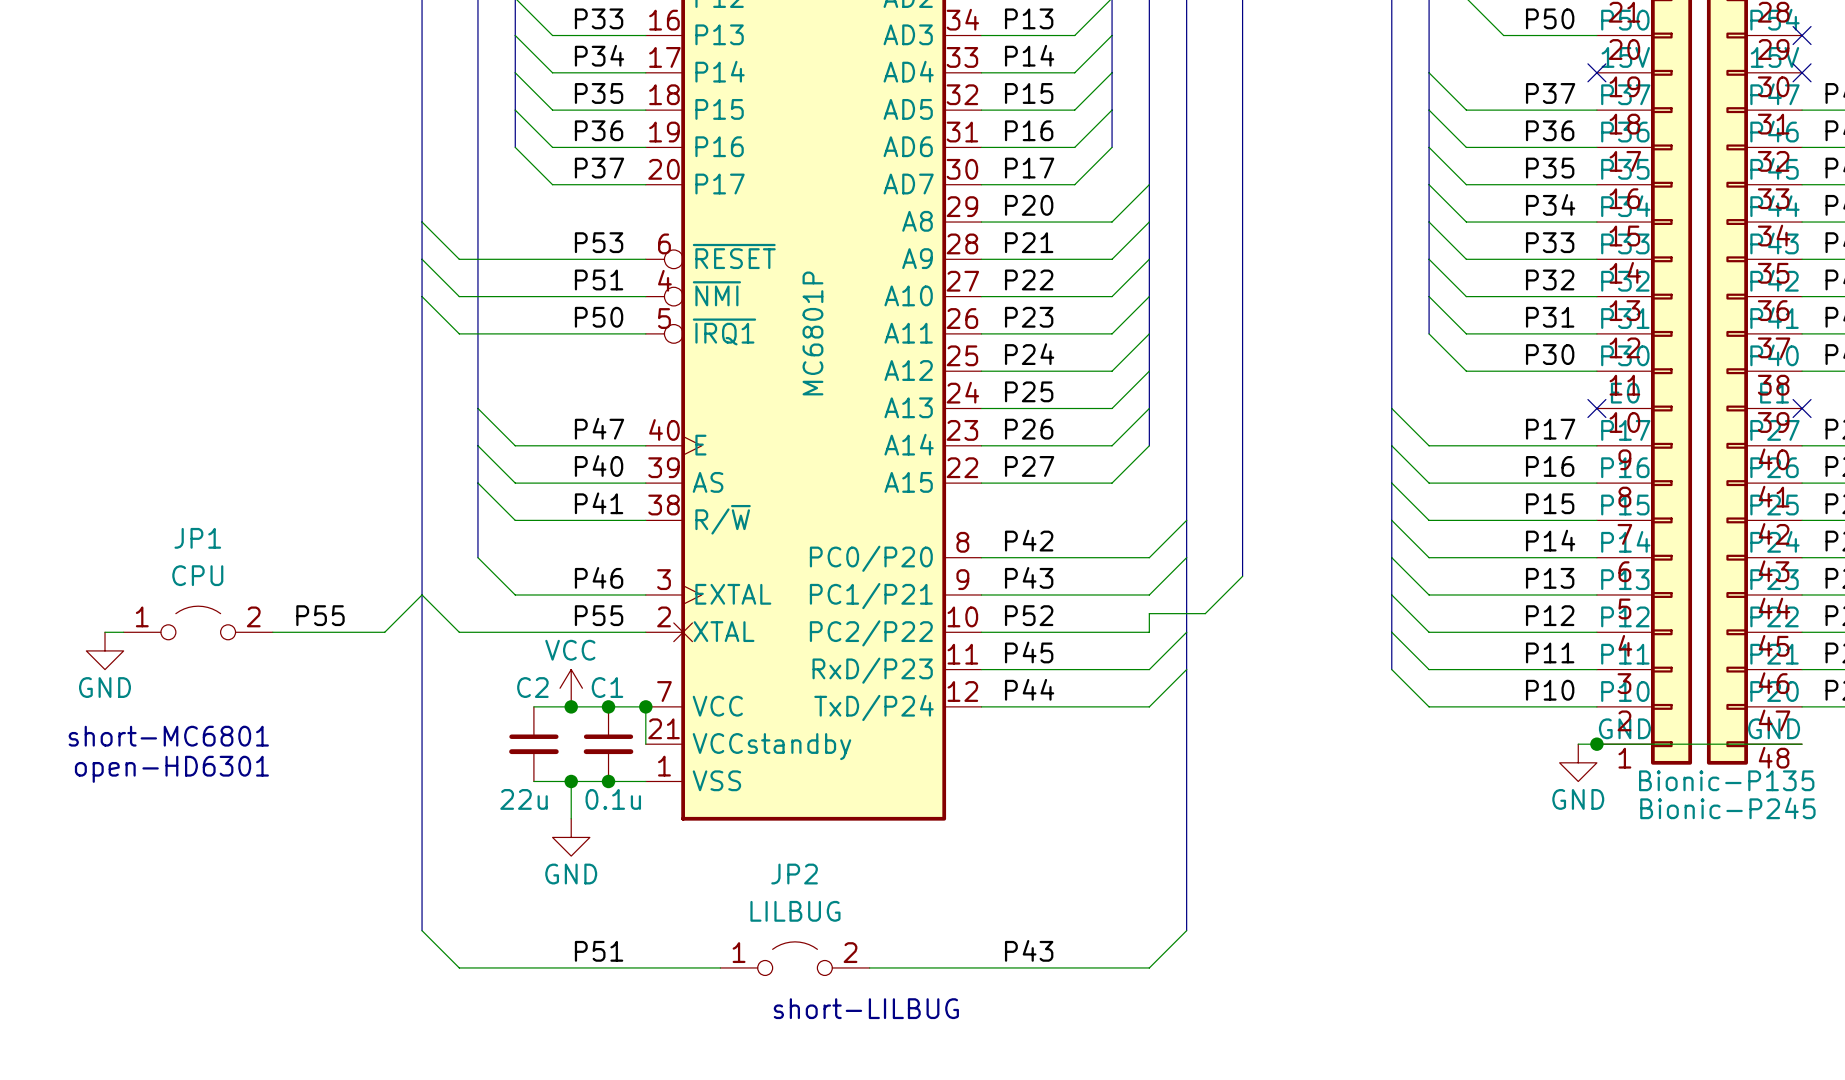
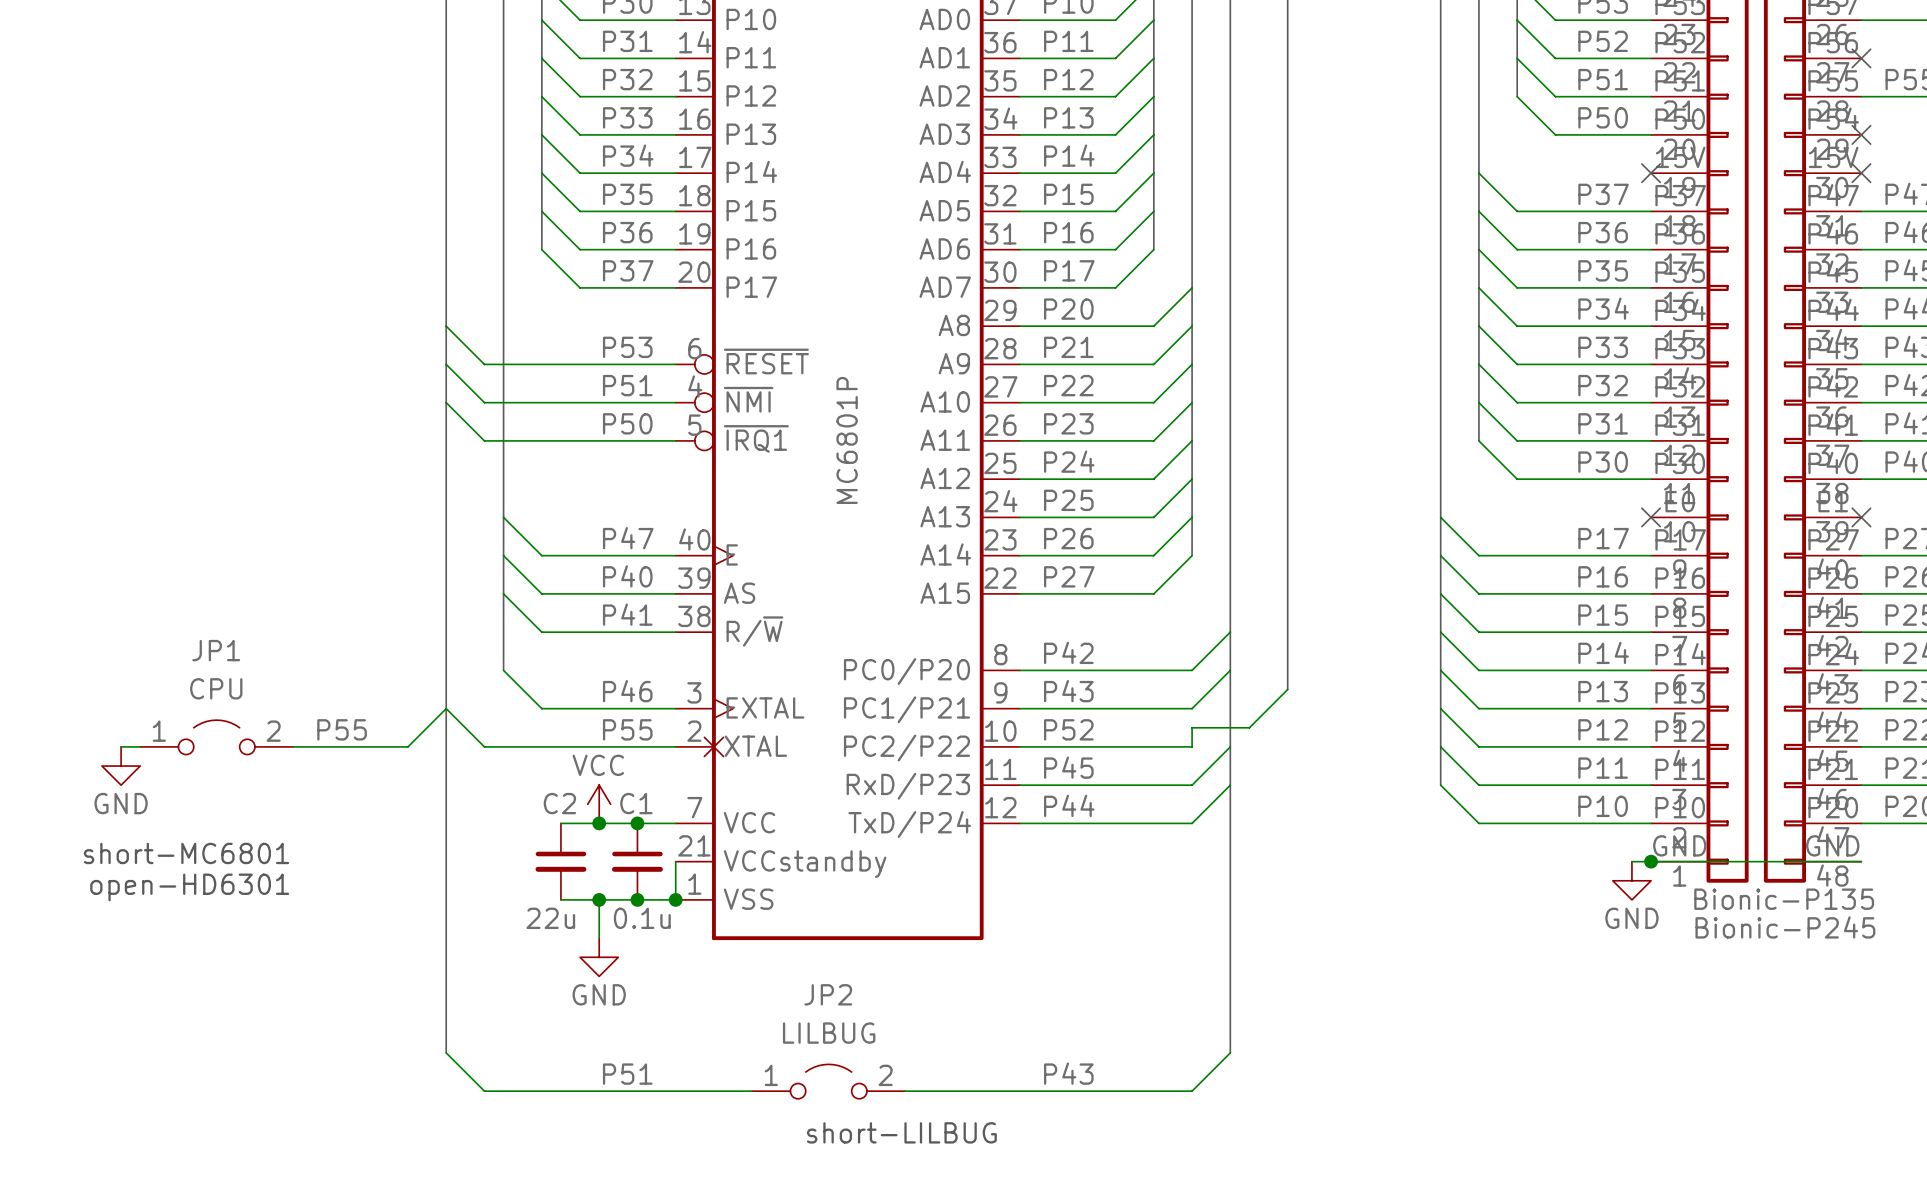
wire: (645, 706) (645, 744) -> (675, 899) (675, 861)
junction position: (645, 706) -> (675, 899)

